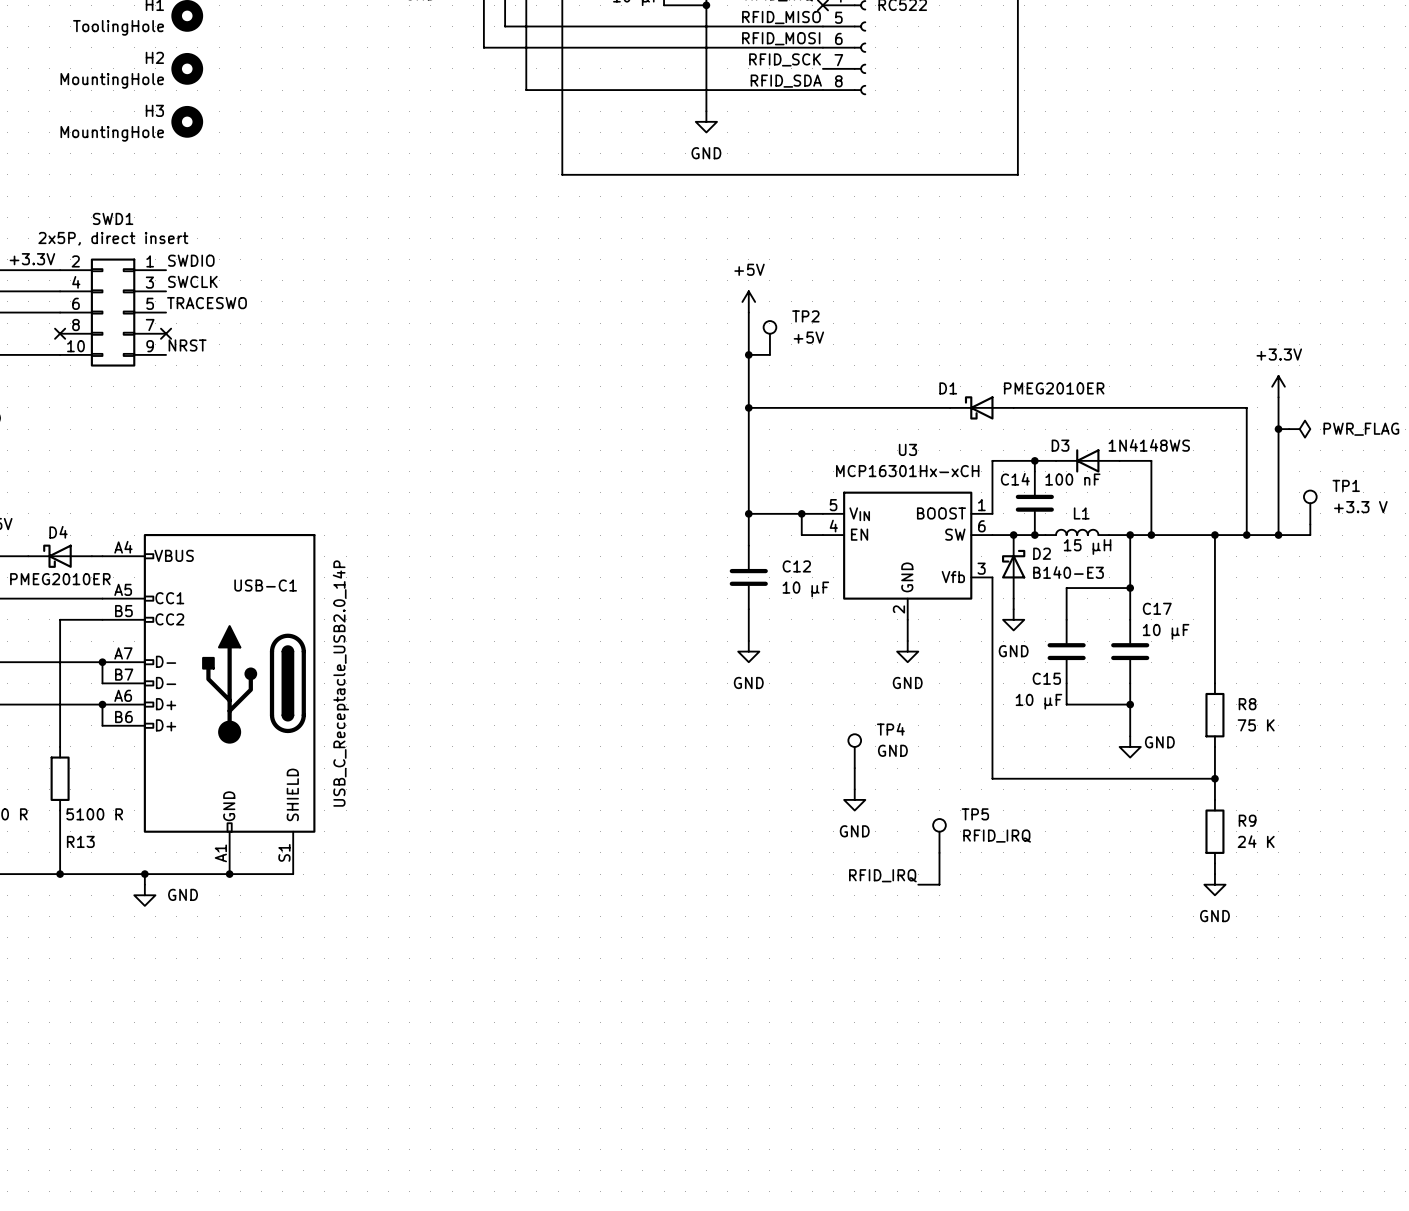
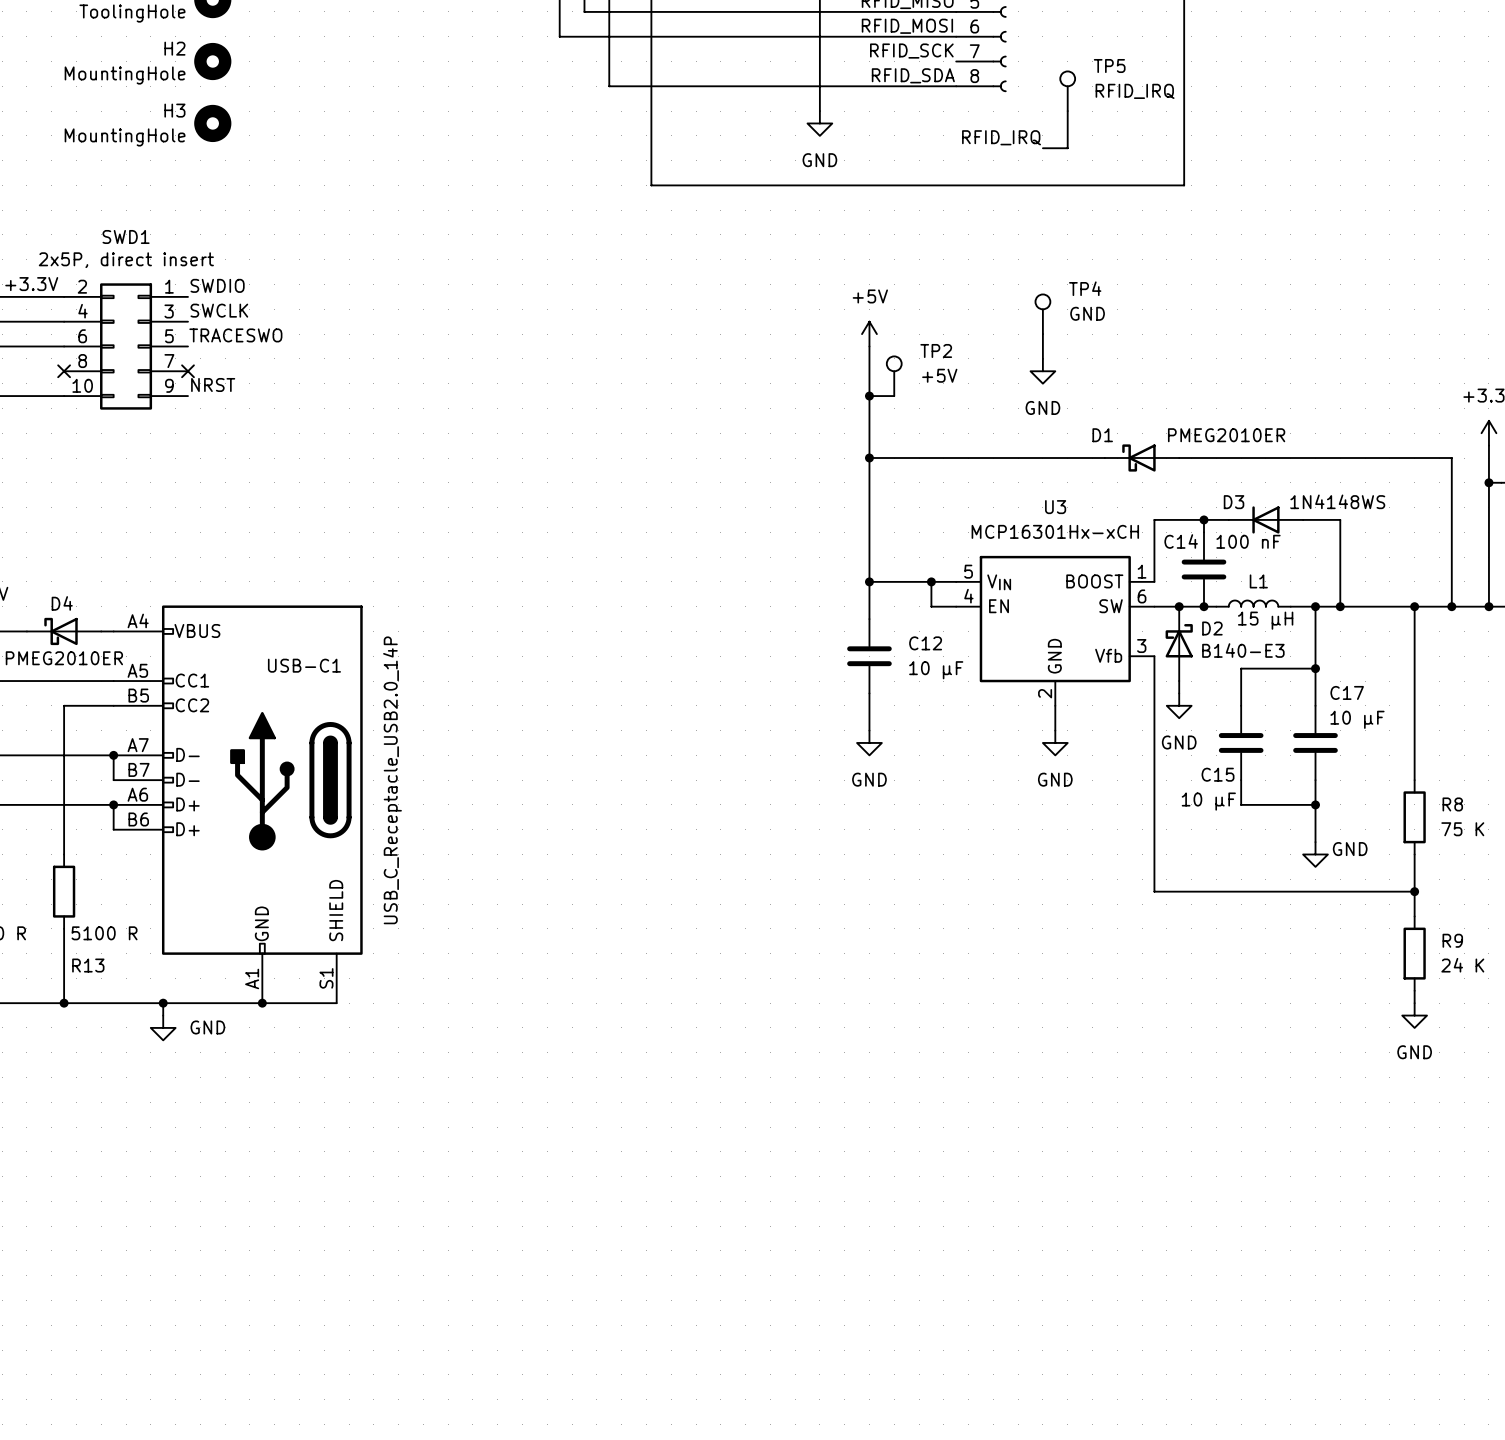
wire: none -> (1067, 111) (1067, 148) (1042, 148)
label: none -> RFID_IRQ (1001, 137)
wire: none -> (1042, 334) (1042, 358)
power symbol: none -> GND (1042, 371)
TP4 position: (854, 751) -> (1042, 314)
wire: (854, 768) (854, 789) -> none
power symbol: GND (854, 799) -> none
TP5 position: (939, 835) -> (1067, 91)
wire: (939, 852) (939, 884) (918, 884) -> none
label: RFID_IRQ (882, 875) -> none

